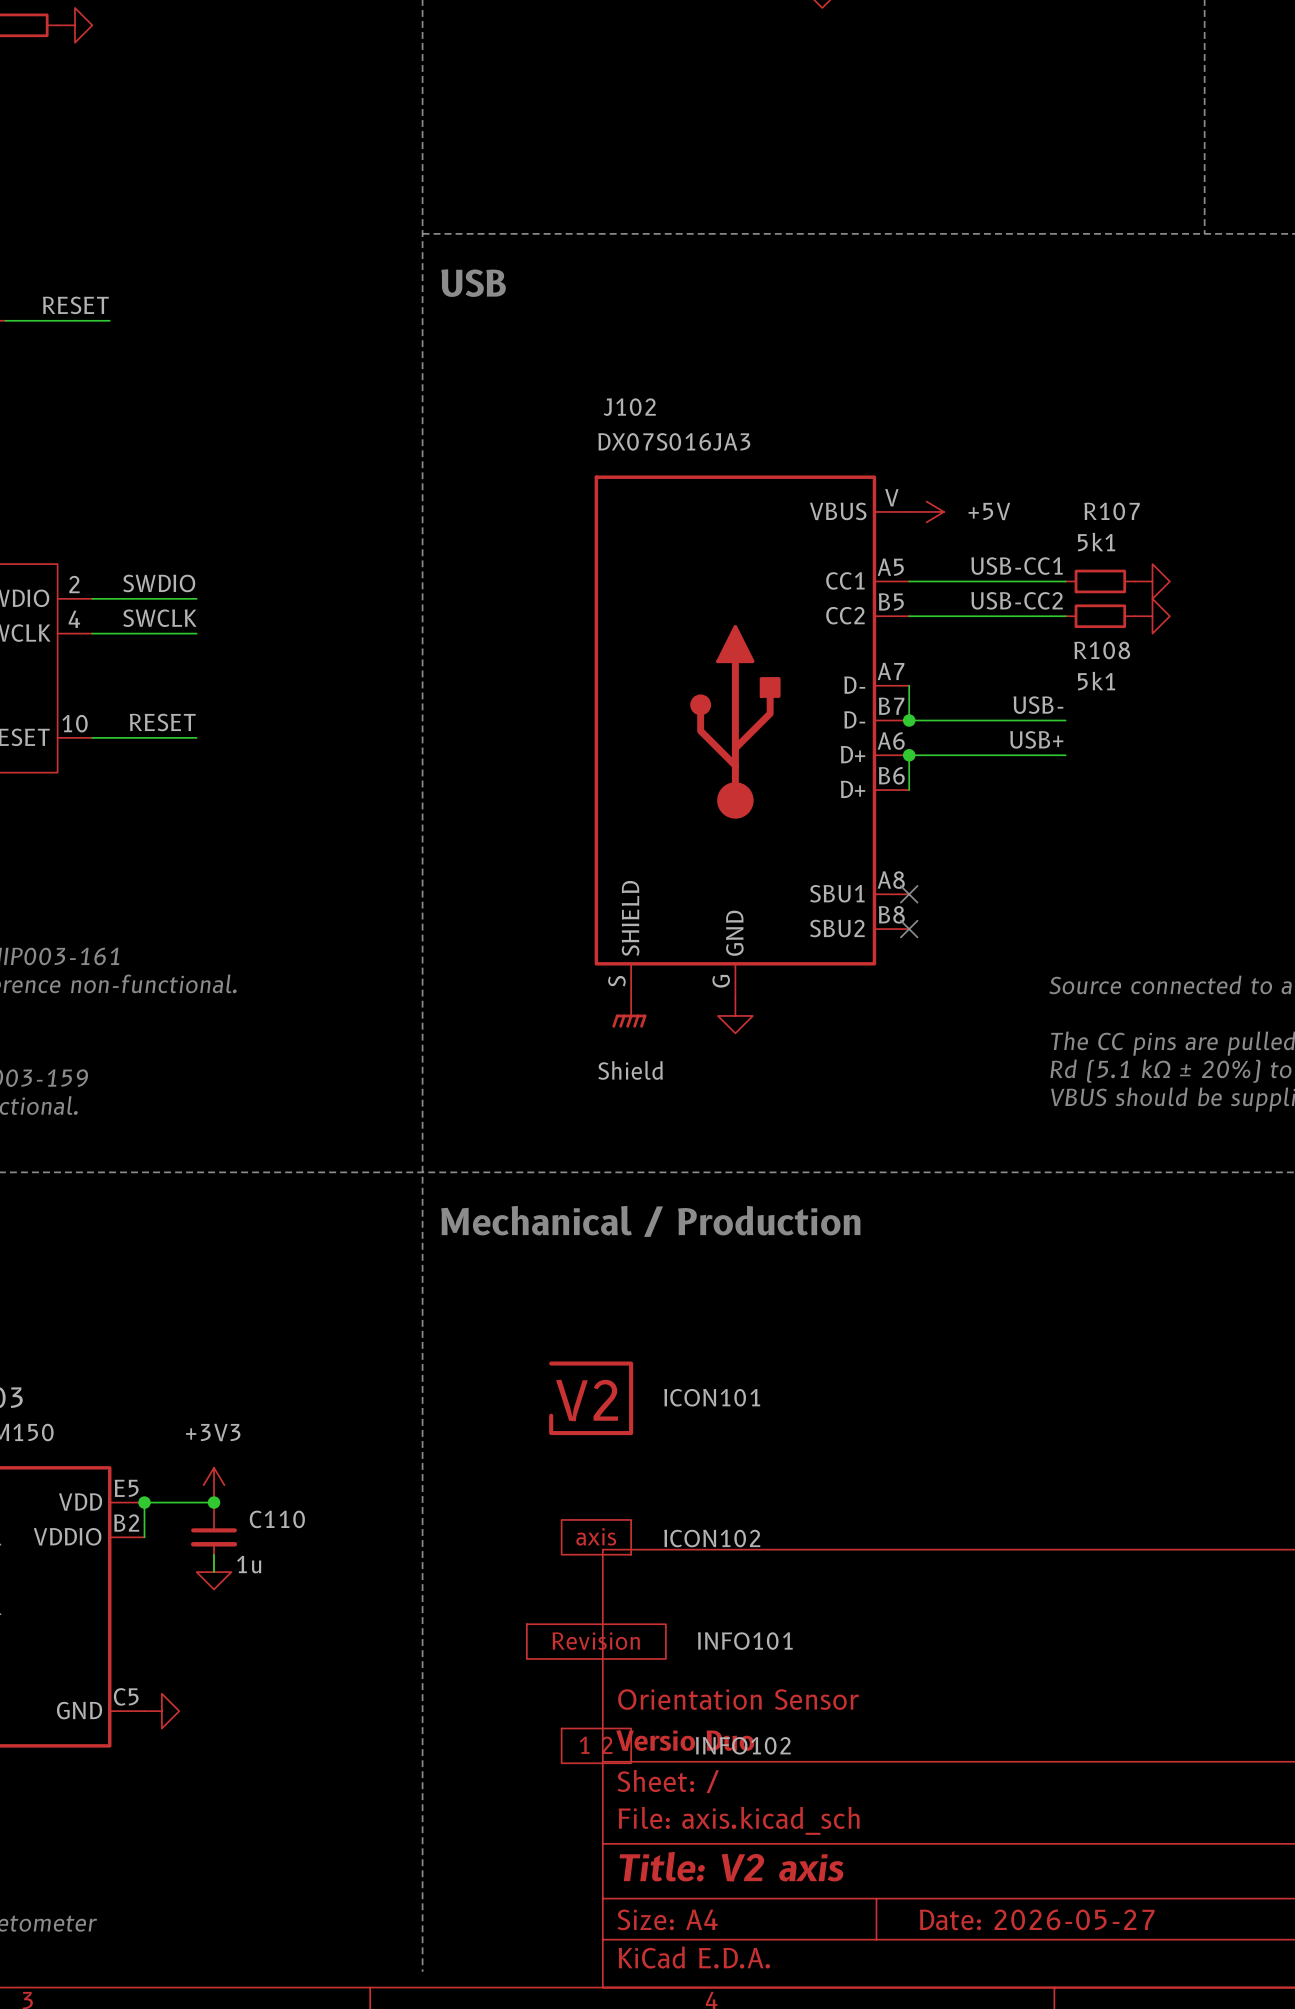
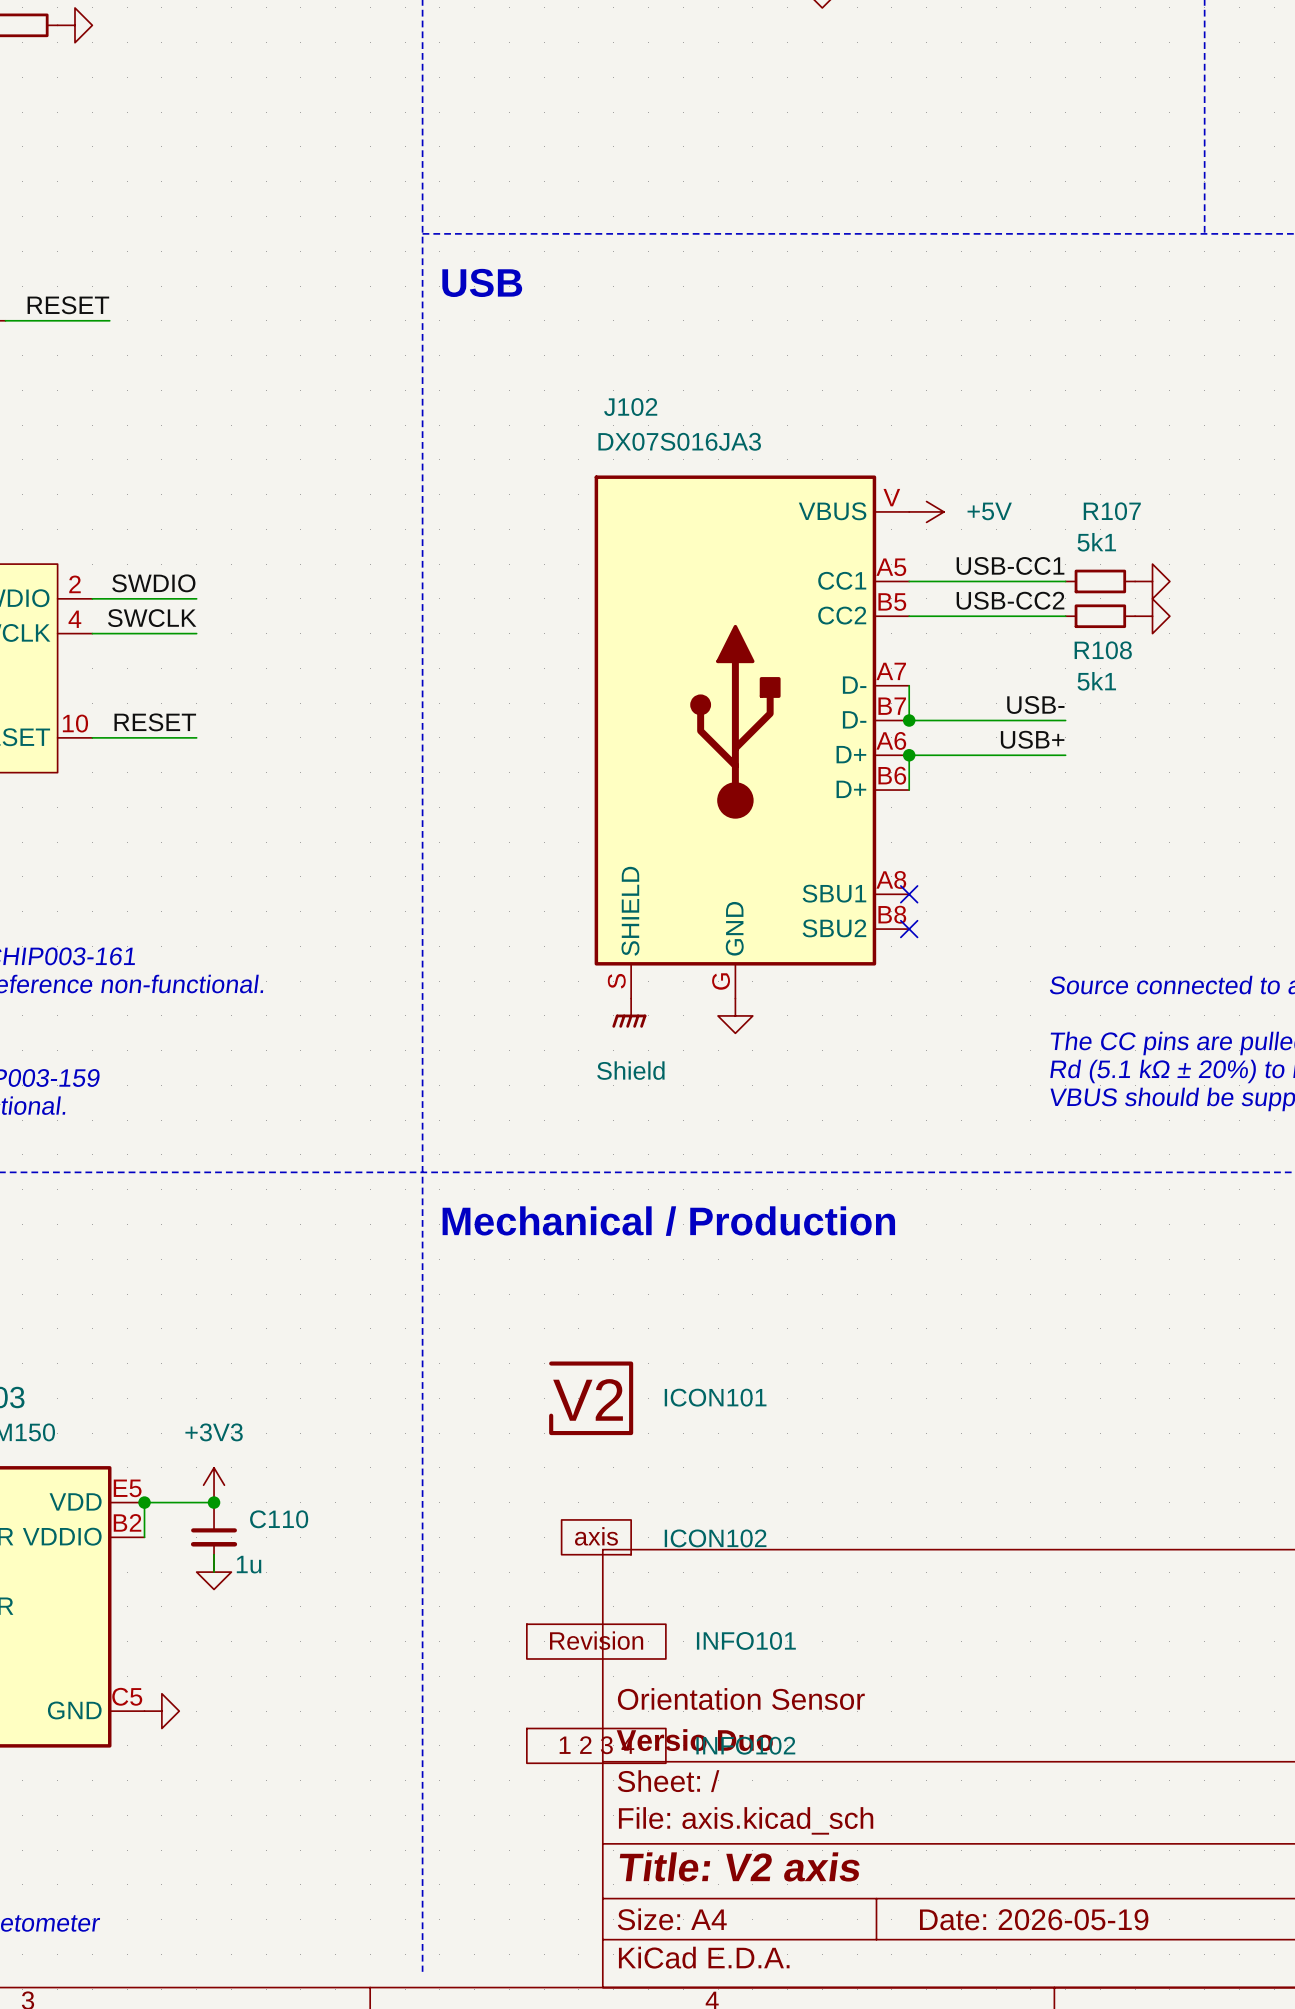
INFO102 symbol: [561, 1728, 632, 1764] -> [526, 1728, 666, 1764]
title block: Date: 2026-05-27 (1037, 1919) -> Date: 2026-05-19 (1034, 1919)

